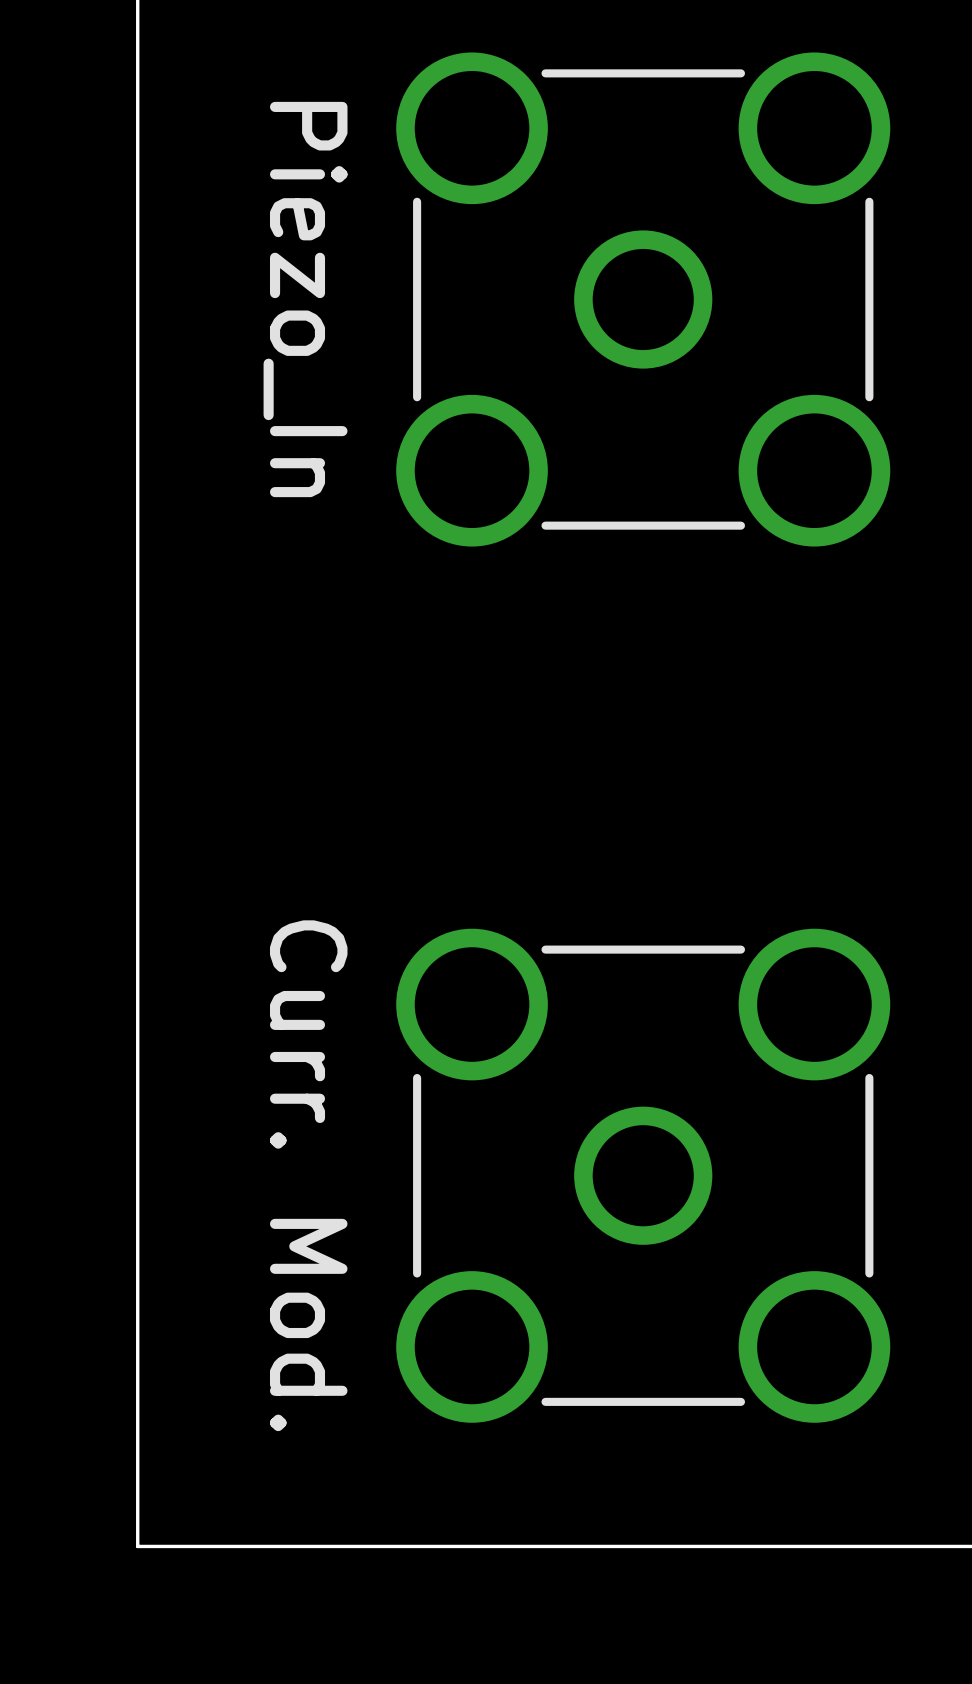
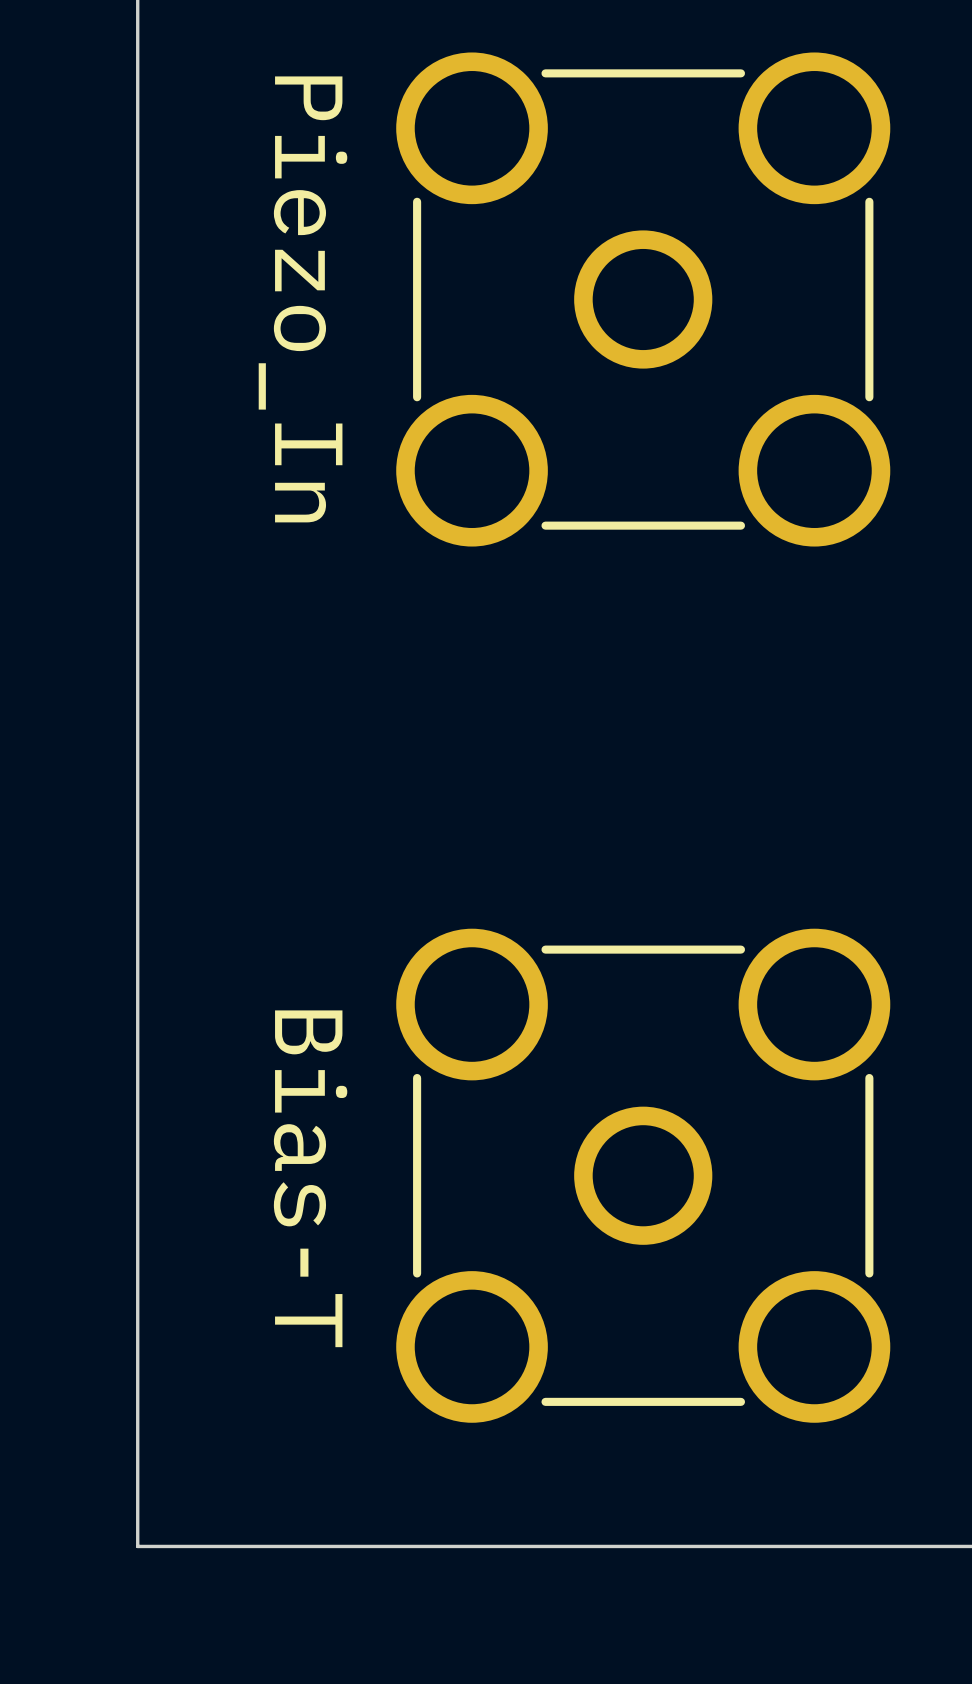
part value: Curr. Mod. (308, 1175) -> Bias-T (310, 1178)

